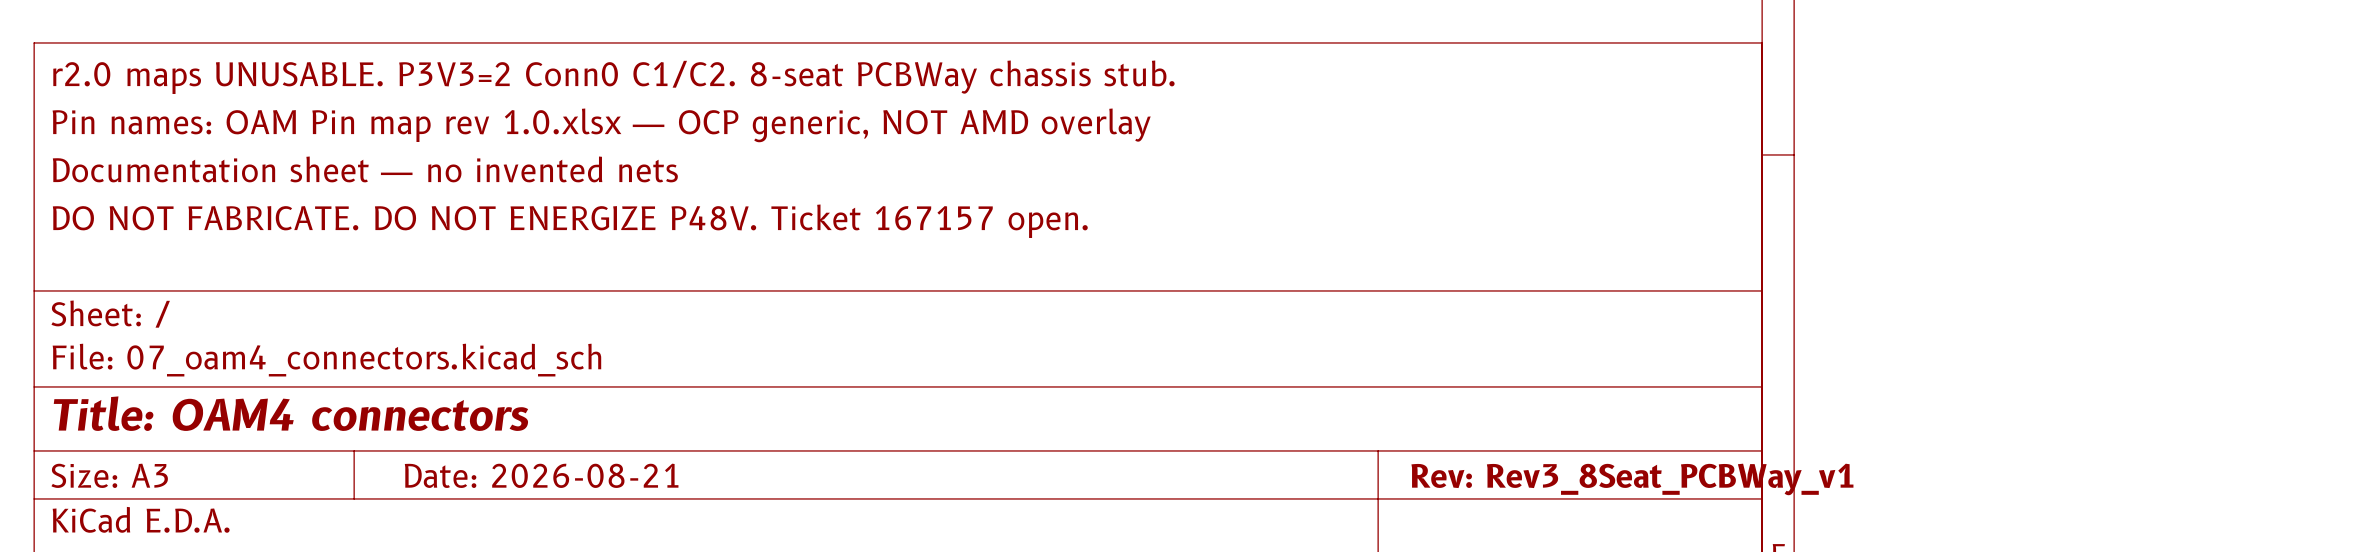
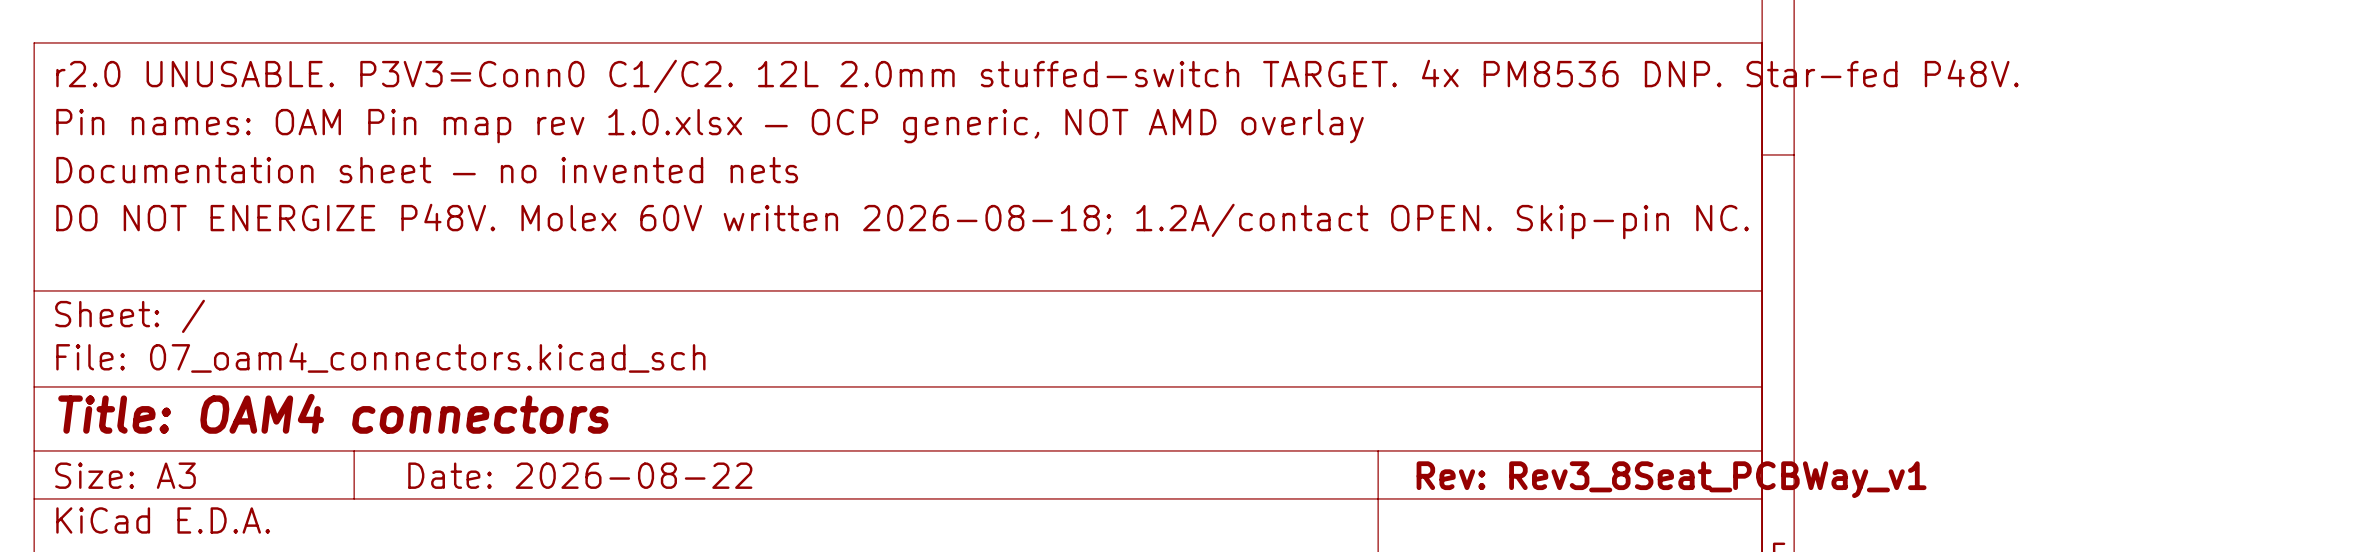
title block: r2.0 maps UNUSABLE. P3V3=2 Conn0 C1/C2. 8-seat PCBWay chassis stub. (613, 77) -> r2.0 UNUSABLE. P3V3=Conn0 C1/C2. 12L 2.0mm stuffed-switch TARGET. 4x PM8536 DNP. Star-fed P48V. (1037, 76)
title block: DO NOT FABRICATE. DO NOT ENERGIZE P48V. Ticket 167157 open. (570, 221) -> DO NOT ENERGIZE P48V. Molex 60V written 2026-08-18; 1.2A/contact OPEN. Skip-pin NC. (902, 221)
title block: Date: 2026-08-21 (541, 475) -> Date: 2026-08-22 (580, 475)

